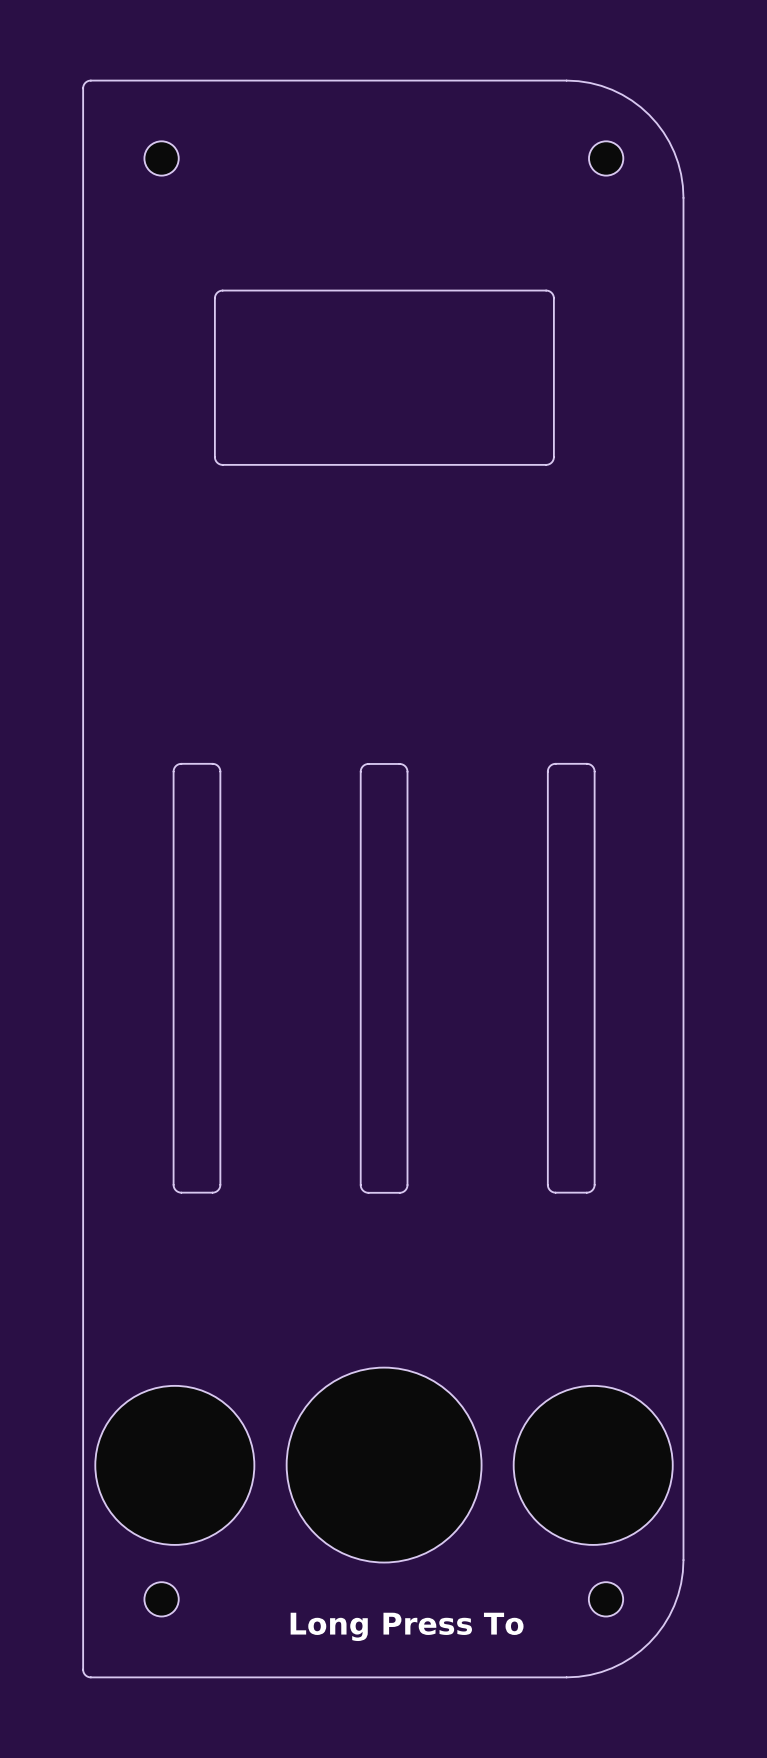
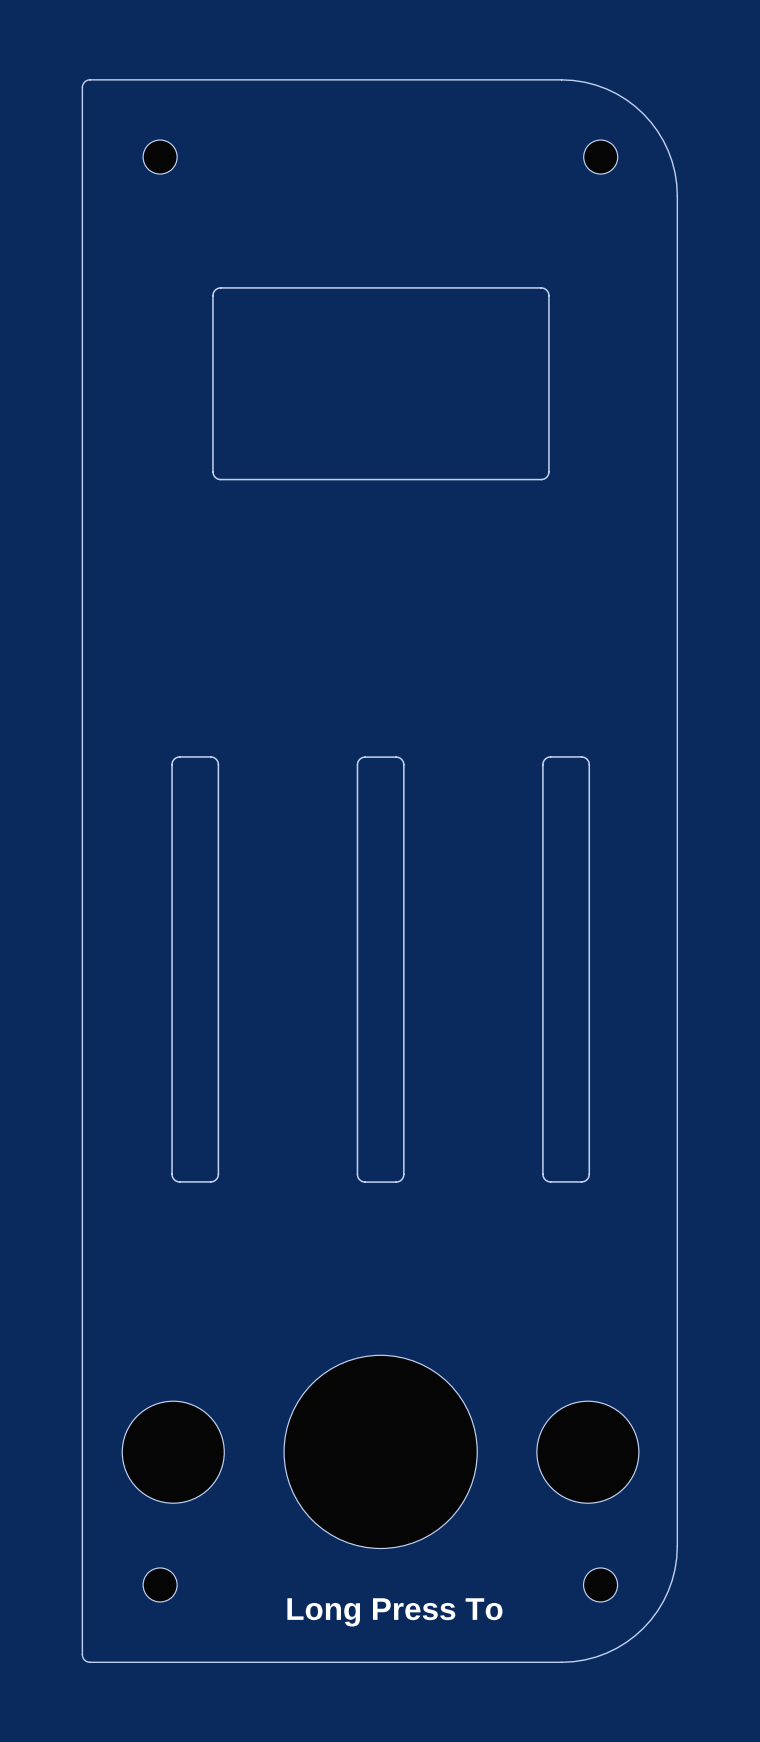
drawing shape: [214, 289, 555, 466] -> [212, 287, 550, 481]
part footprint: [95, 1385, 255, 1545] -> [122, 1401, 225, 1504]
part footprint: [513, 1385, 673, 1545] -> [536, 1401, 639, 1504]

